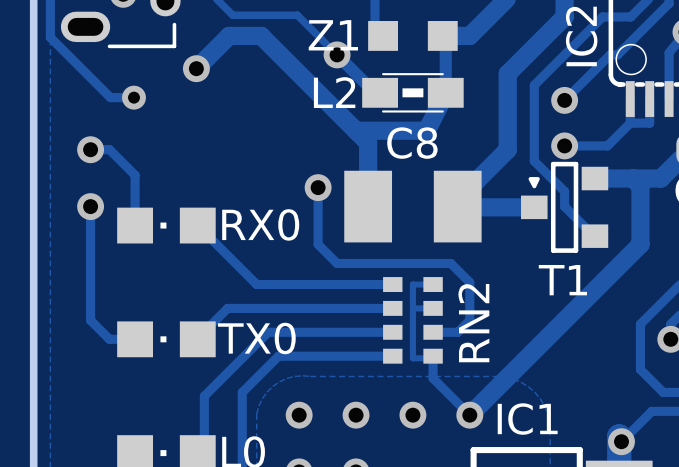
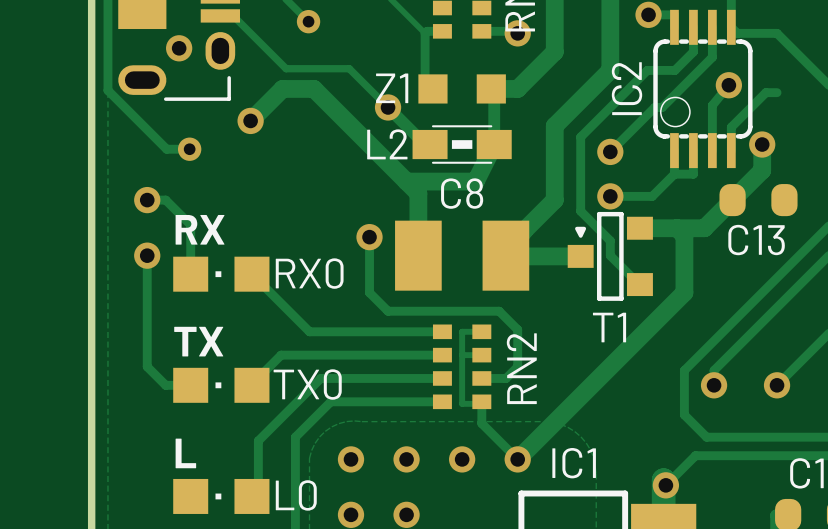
text: none -> RX (200, 229)
text: none -> TX (198, 341)
text: none -> L (185, 453)

